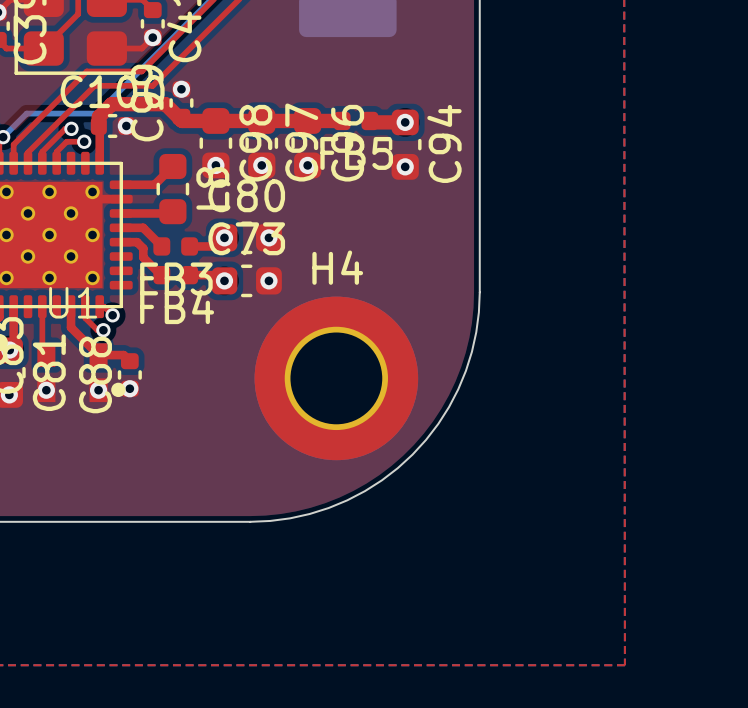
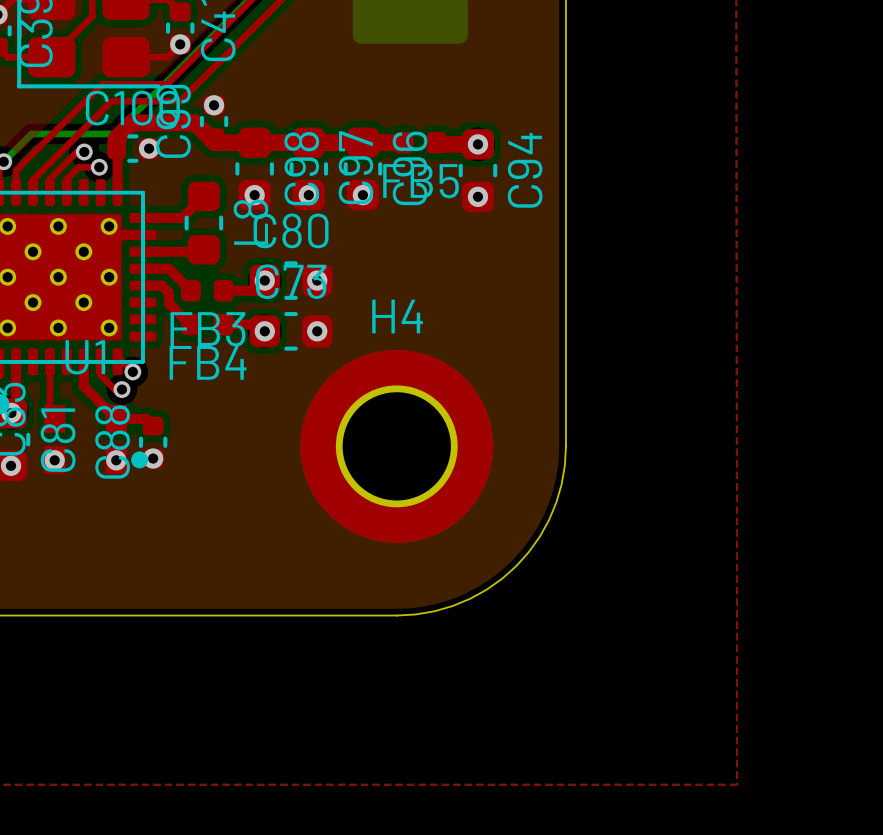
board edge: (479, 292) (476, 332) (465, 370) (449, 407) (438, 423) (412, 454) (381, 480) (347, 500) (309, 514) (290, 518) (250, 521) -> (565, 344) (565, 446) (561, 484) (556, 502) (540, 536) (516, 565) (502, 578) (470, 598) (434, 611) (396, 615) (295, 615)

